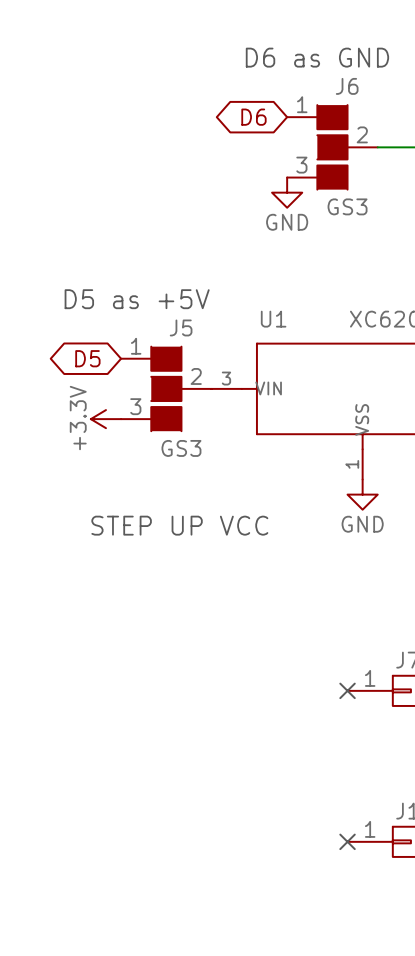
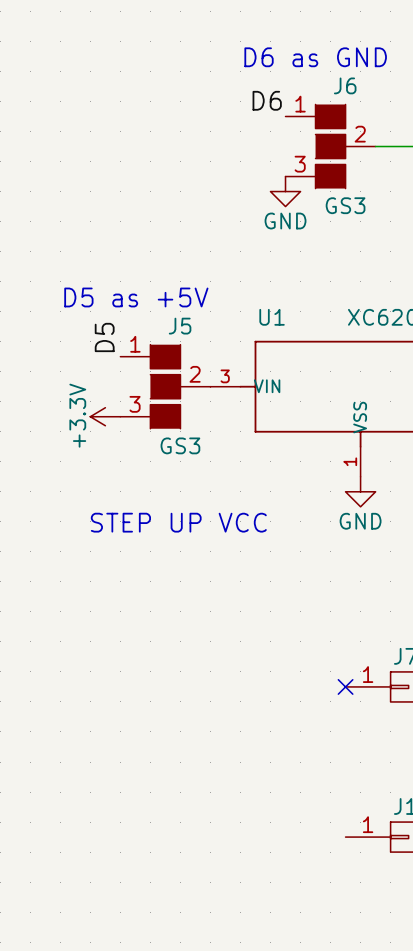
label: none -> D6 (267, 100)
global label: D6 (253, 117) -> none
label: none -> D5 (104, 337)
global label: D5 (87, 358) -> none
no-connect mark: (347, 841) -> none

